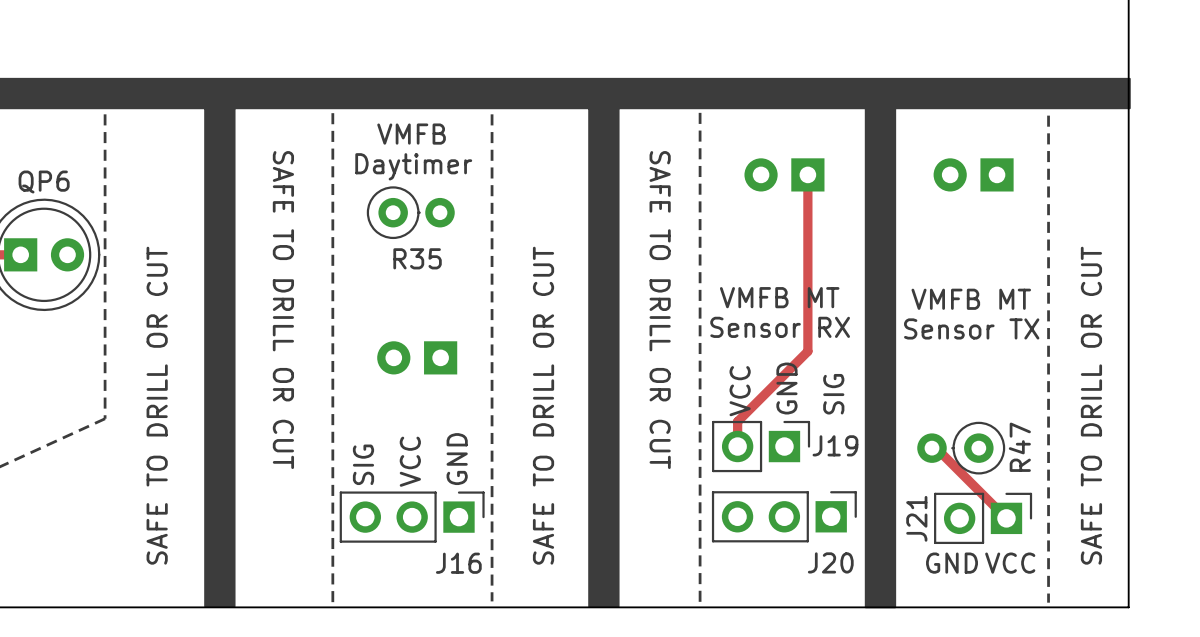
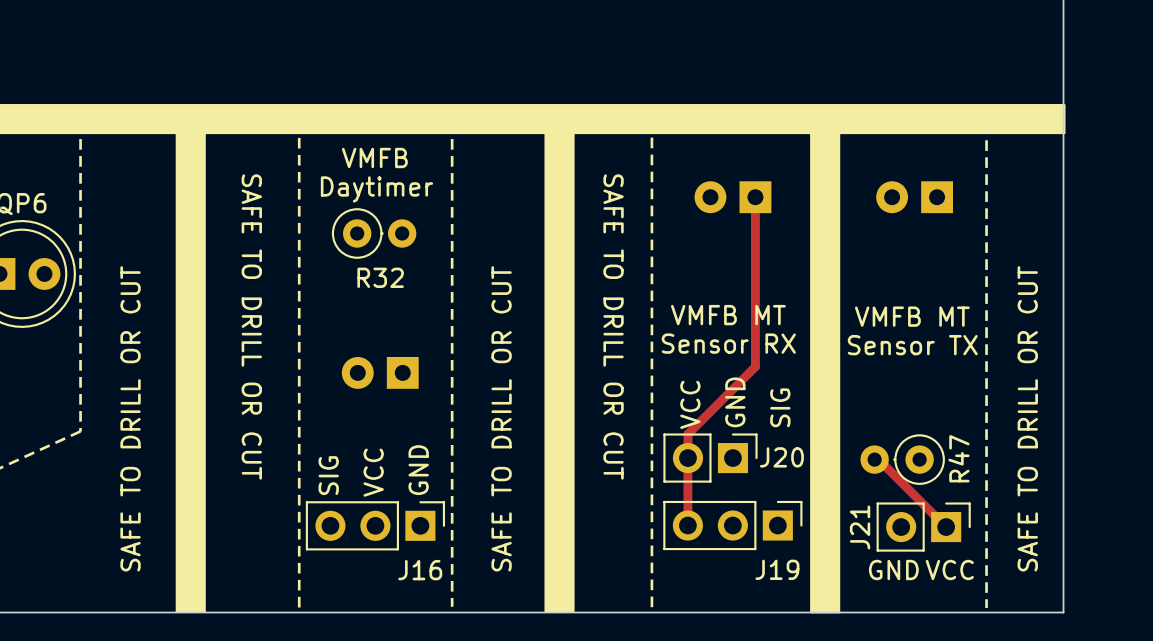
R35 name: R35 (417, 258) -> R32 (380, 277)
track: none -> (687, 446) (687, 525)
J19 name: J19 (835, 445) -> J20 (781, 457)
J20 name: J20 (830, 562) -> J19 (777, 569)

